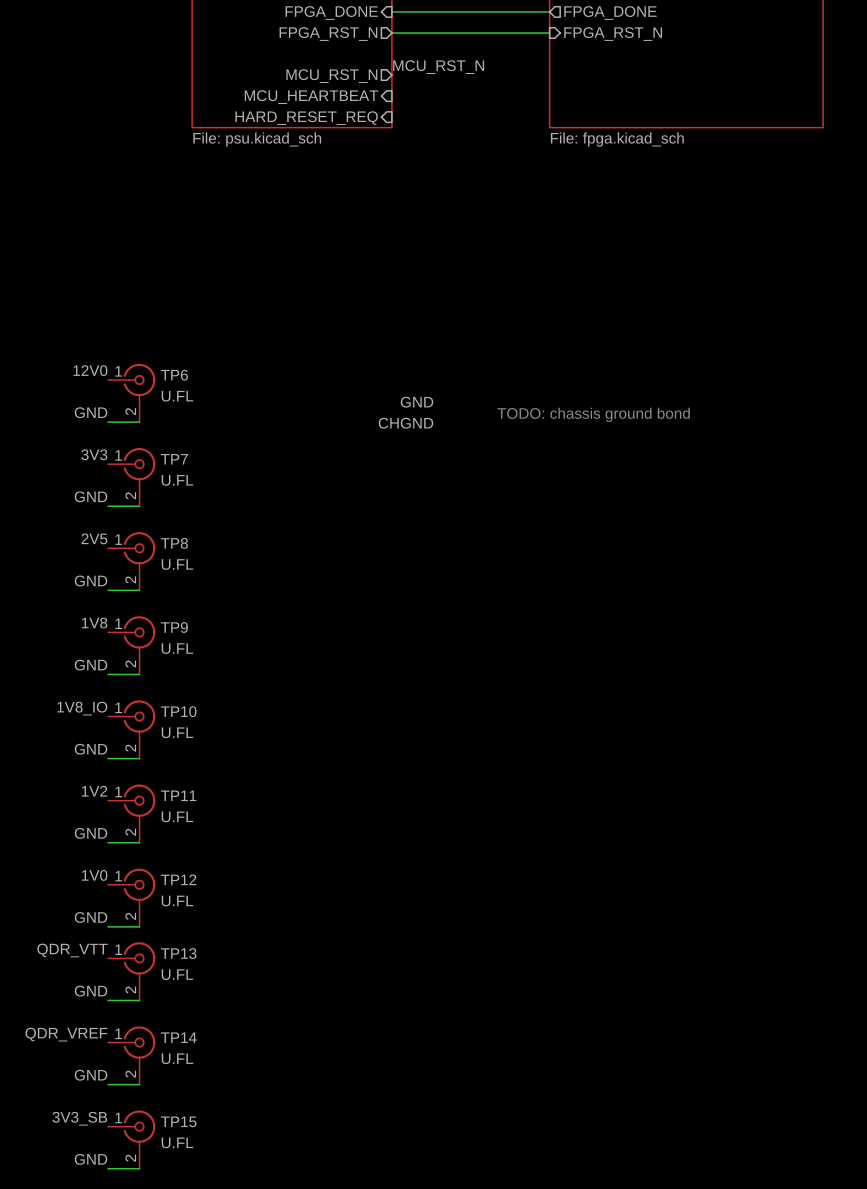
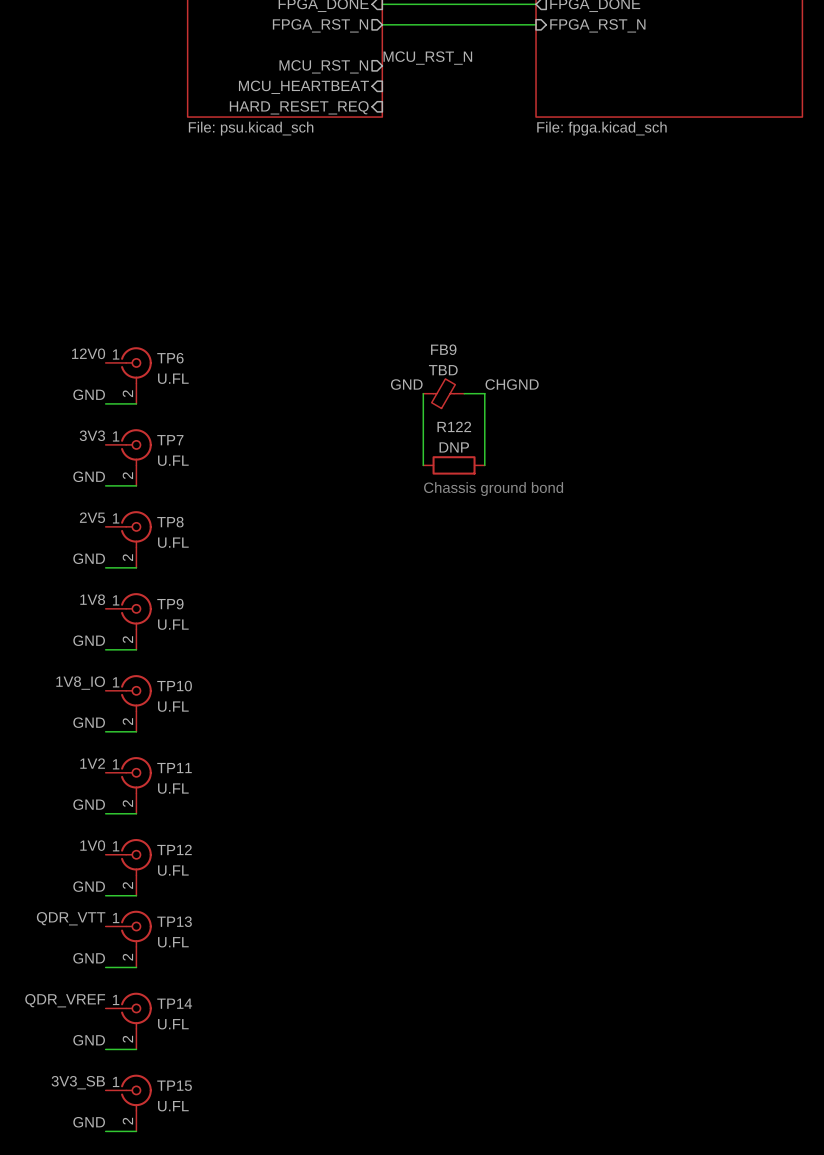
wire: none -> (423, 393) (423, 465)
FB9: none -> TBD (443, 393)
wire: none -> (464, 393) (484, 393) (484, 465)
text: TODO: chassis ground bond (593, 414) -> none
label position: CHGND (405, 423) -> CHGND (512, 384)
R122: none -> DNP (454, 465)
text: none -> Chassis ground bond (493, 489)

